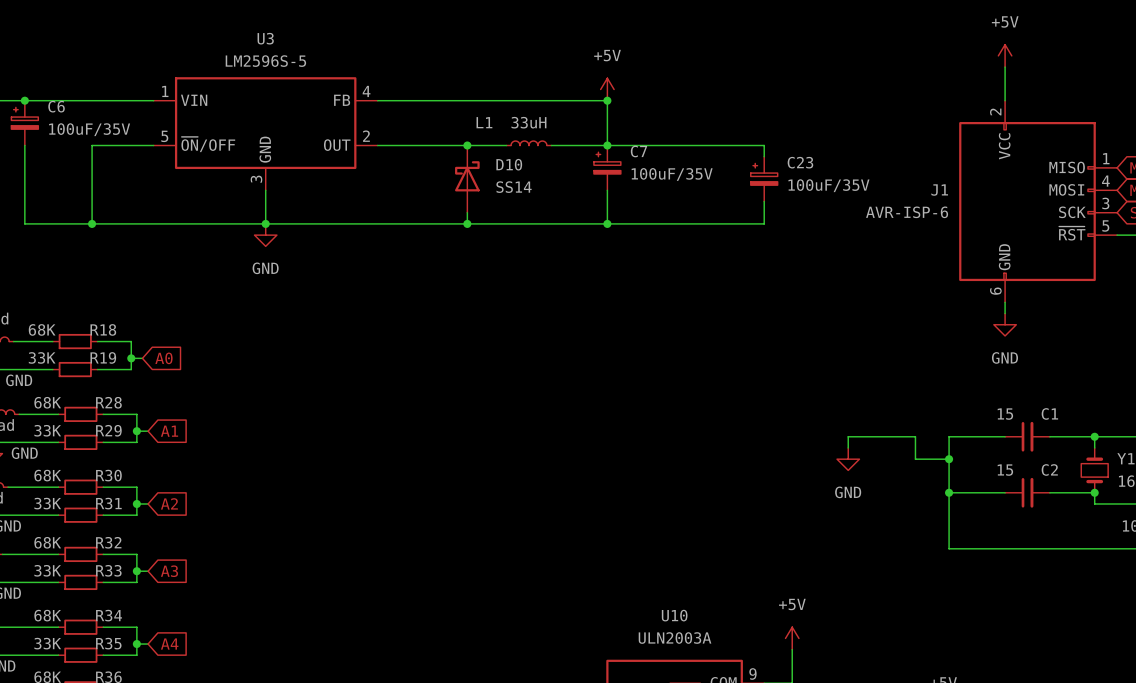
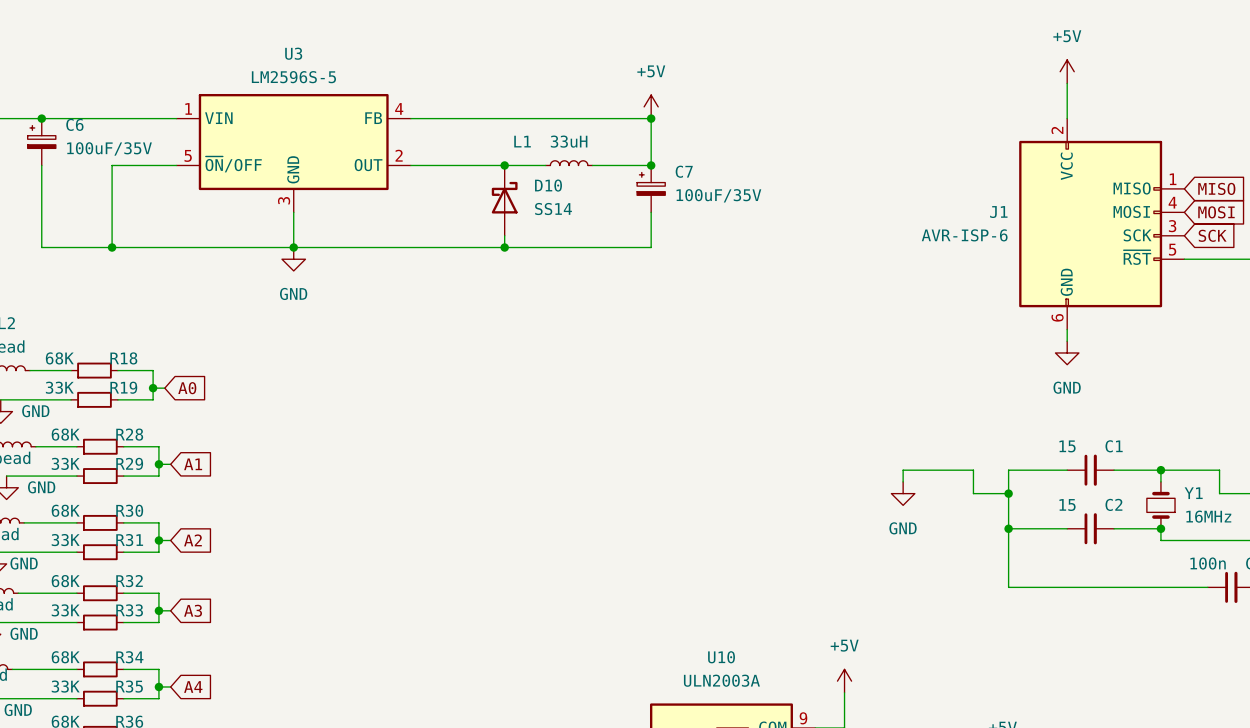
wire: (607, 145) (764, 145) (764, 156) -> none
C23: 100uF/35V (764, 179) -> none
wire: (764, 201) (764, 223) (607, 223) -> none
junction: (607, 223) -> none

